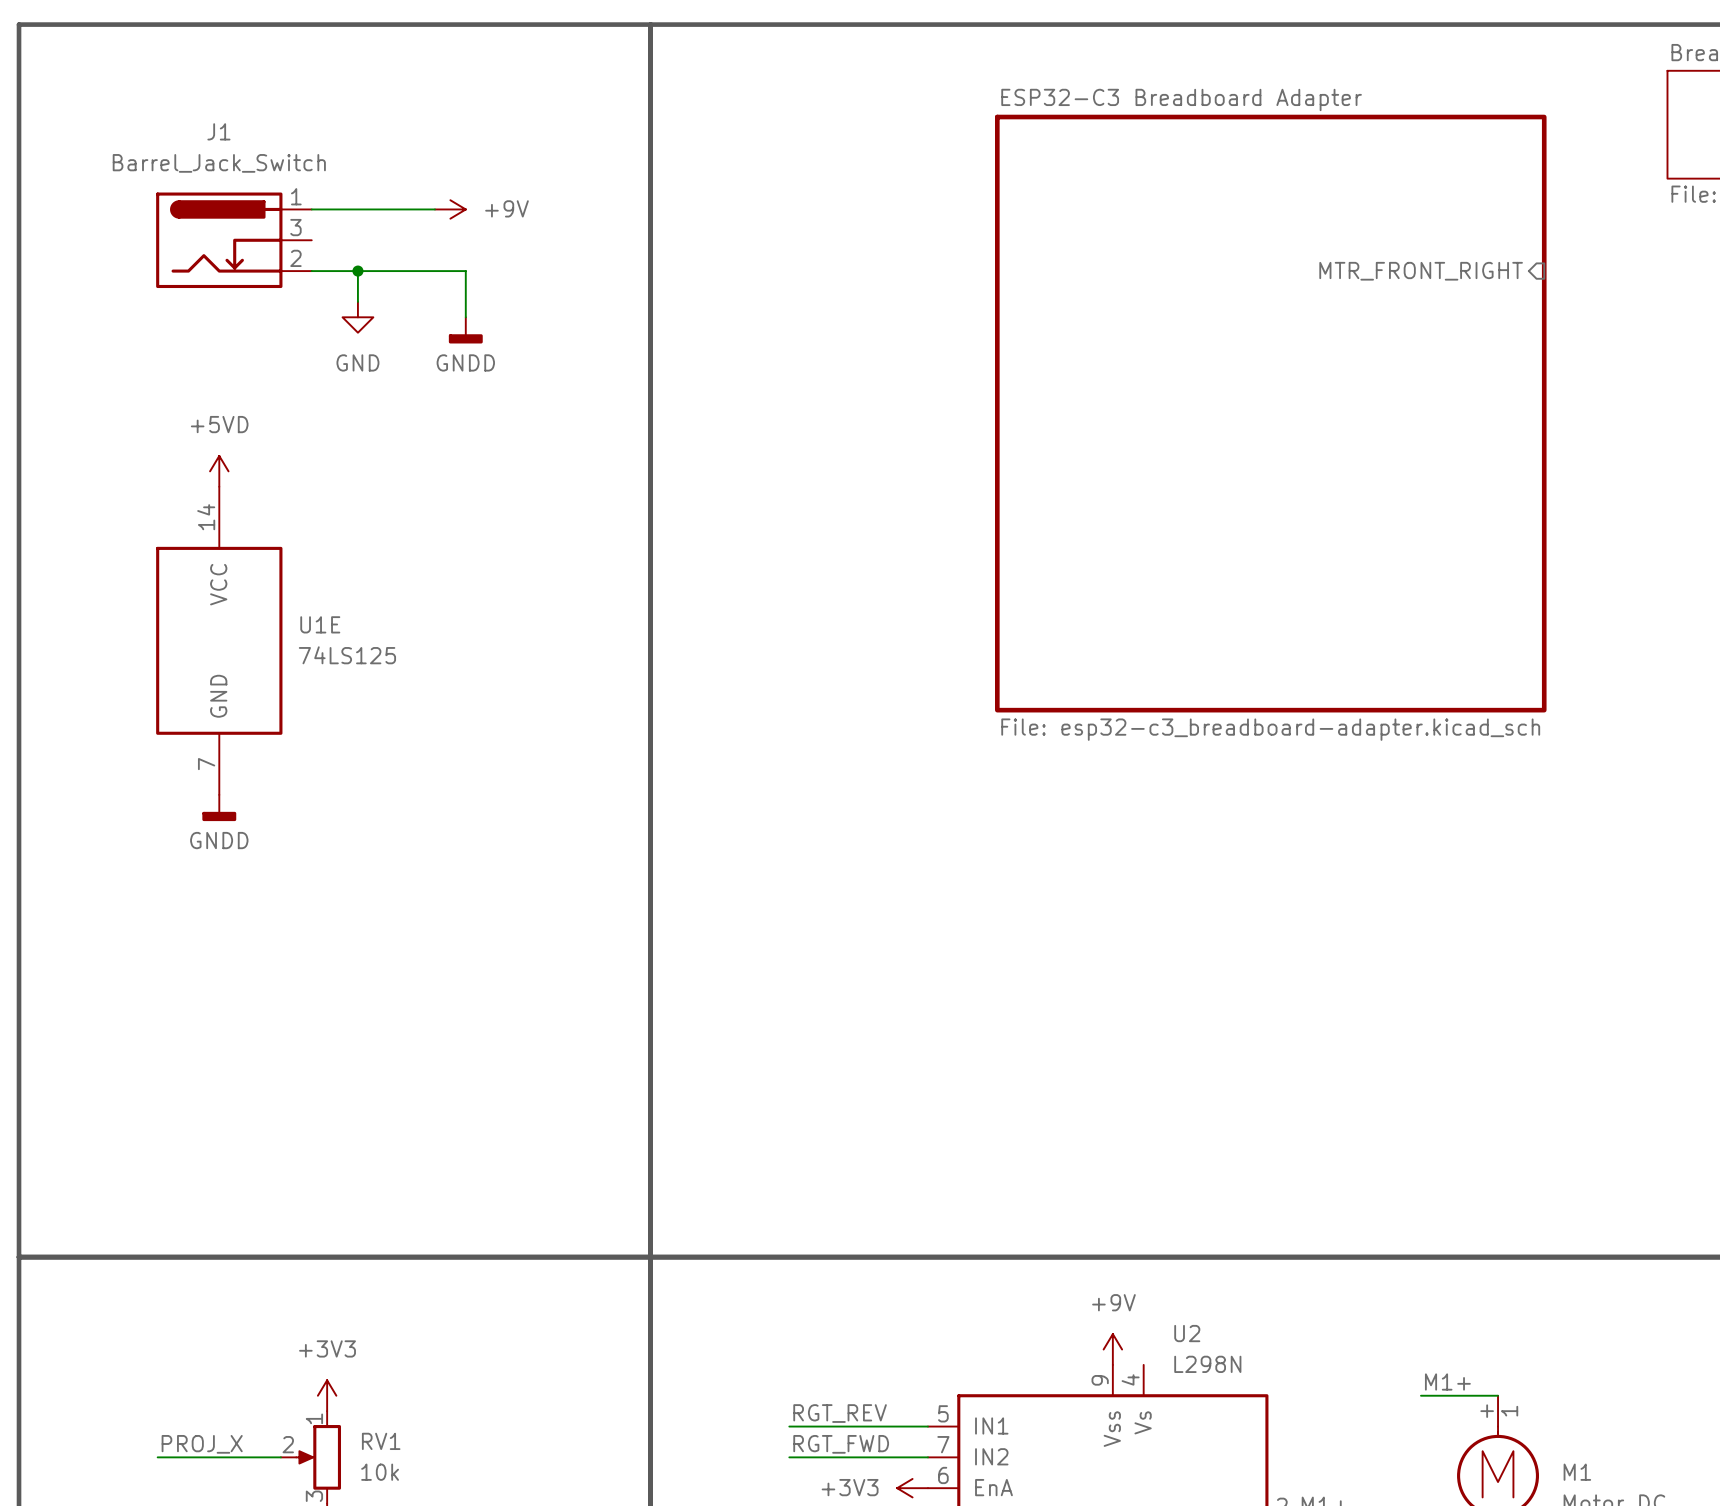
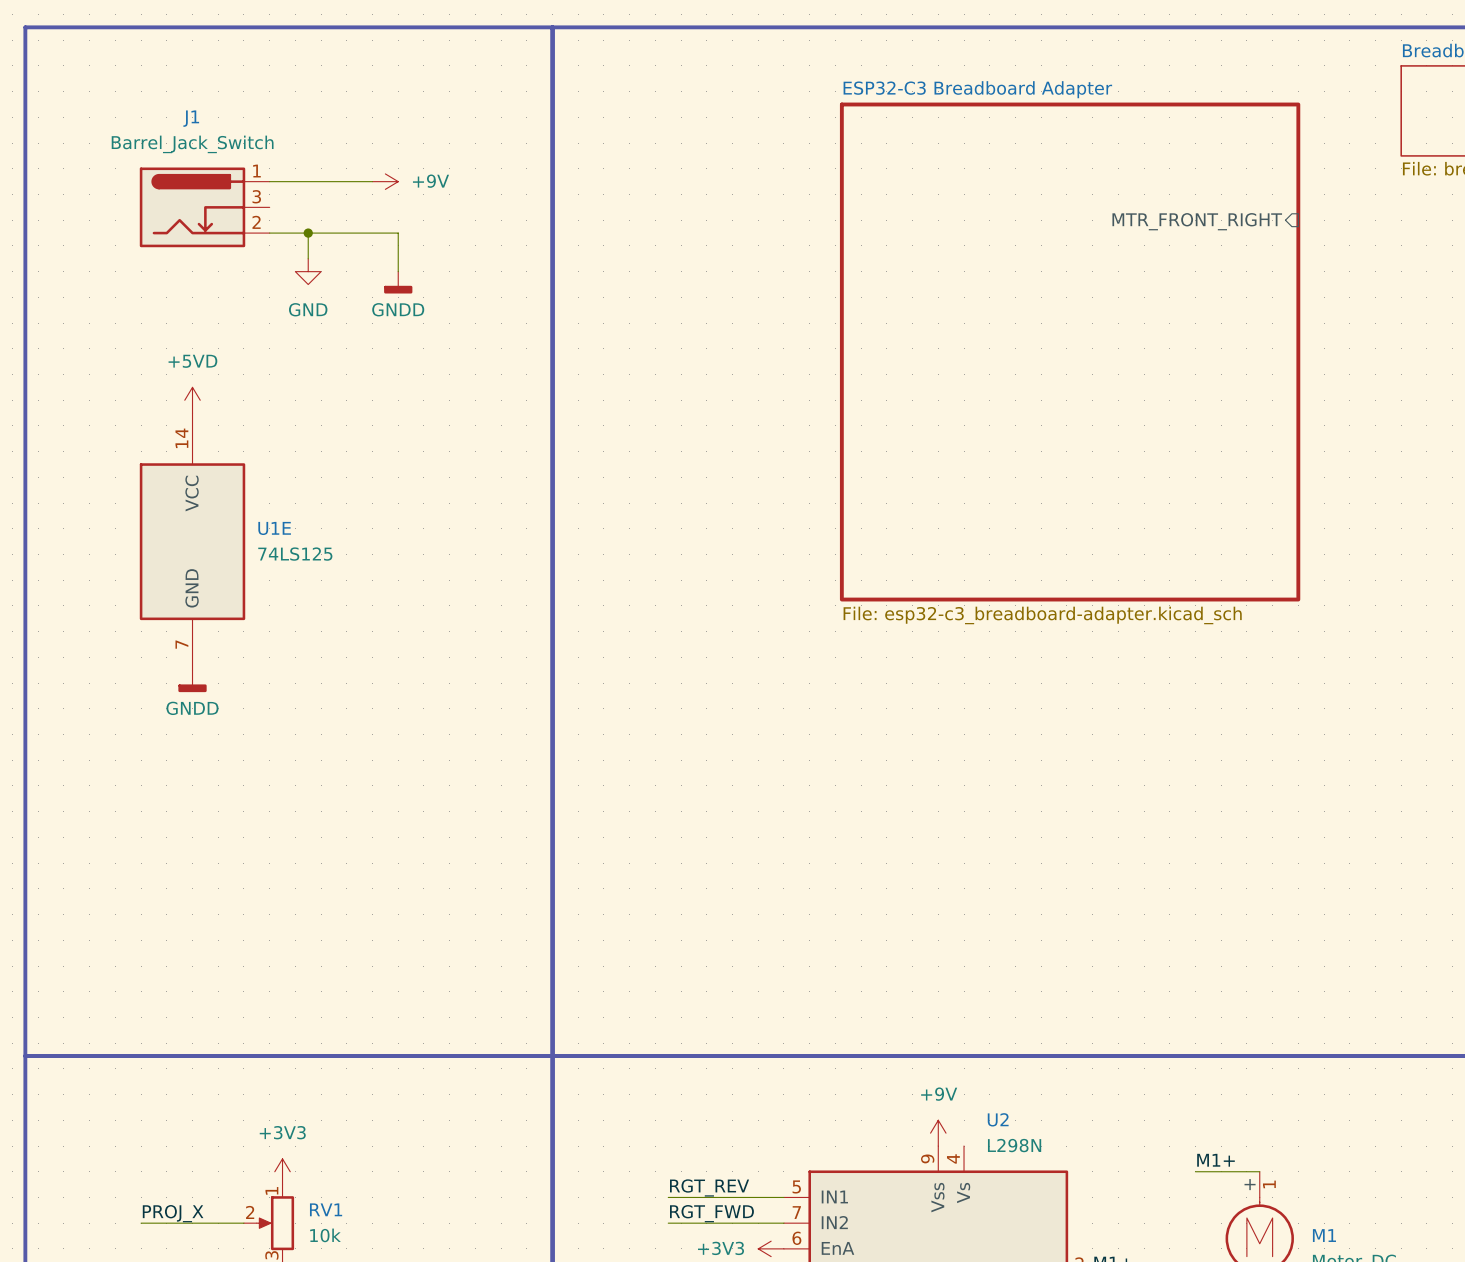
sheet pin position: MTR_FRONT_RIGHT (1421, 271) -> MTR_FRONT_RIGHT (1197, 221)

